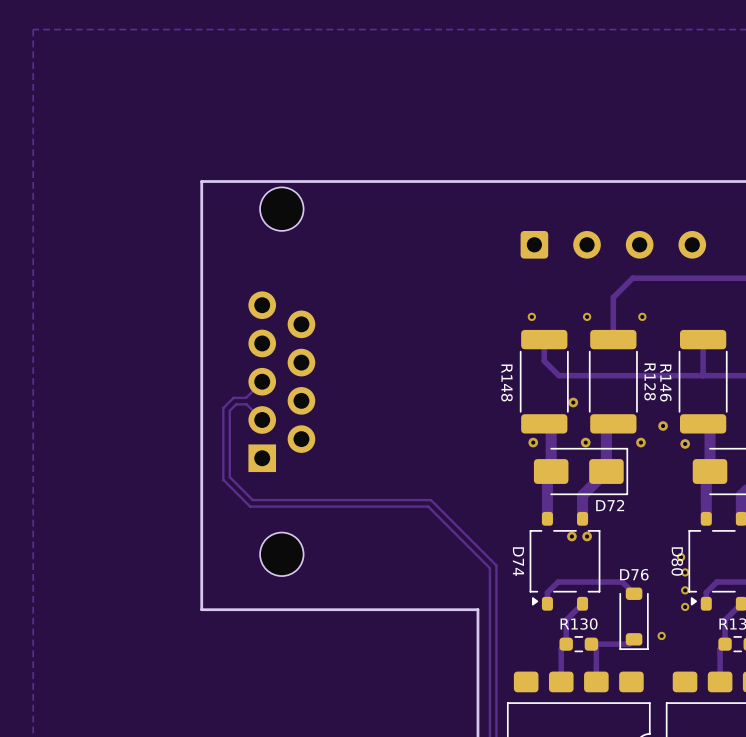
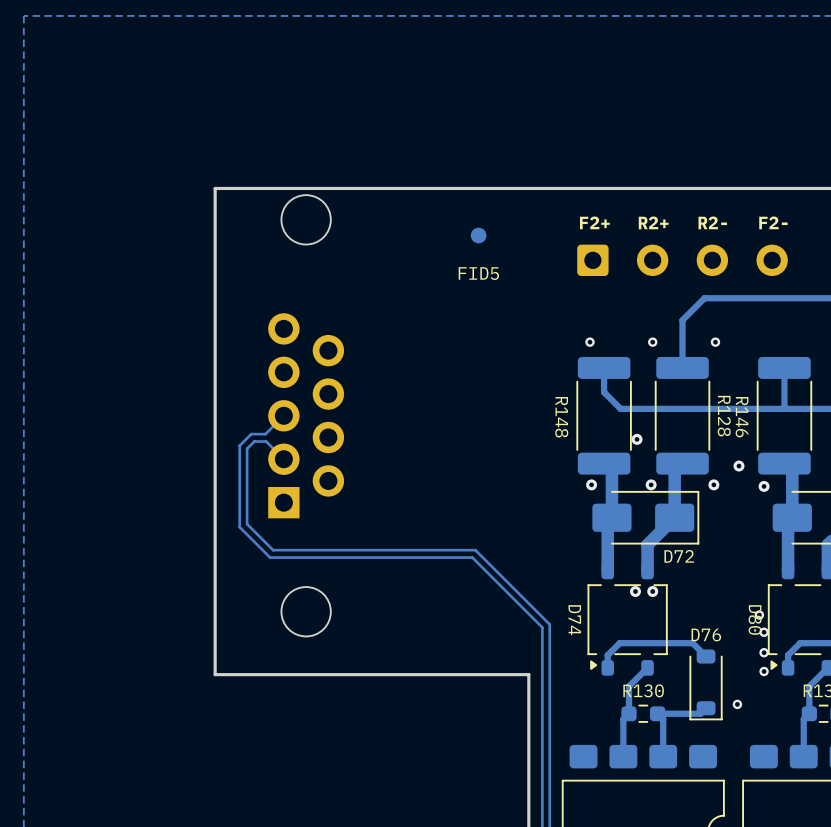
text: none -> F2+ (594, 222)
text: none -> R2+ (653, 222)
text: none -> R2- (712, 222)
text: none -> F2- (773, 222)
FID5: none -> (478, 235)

